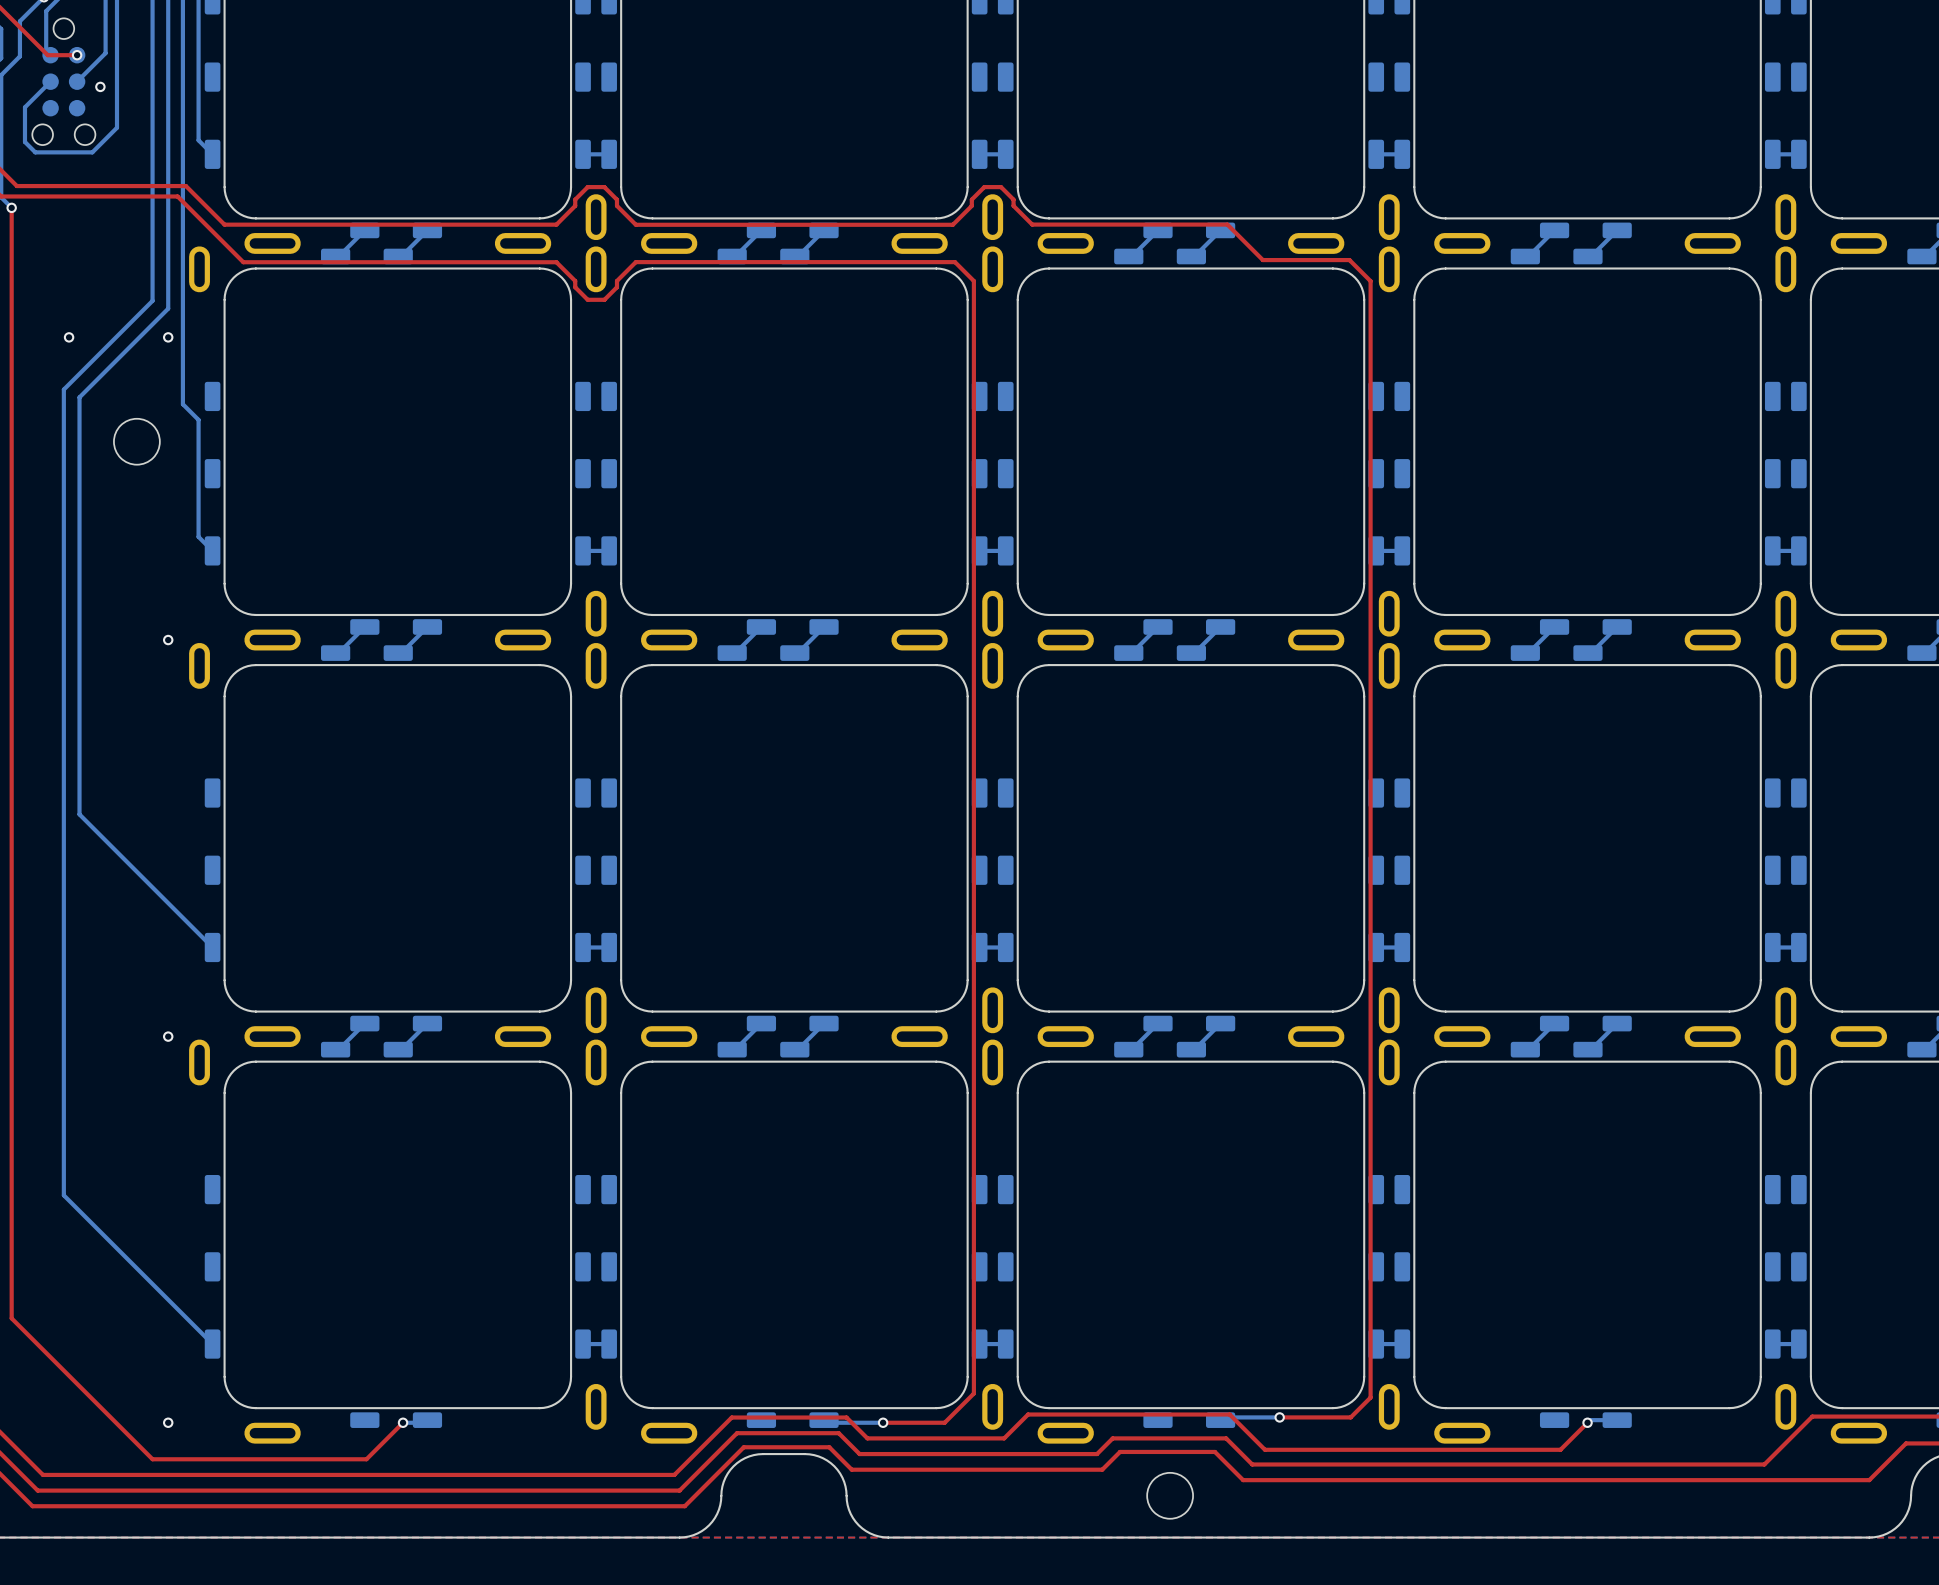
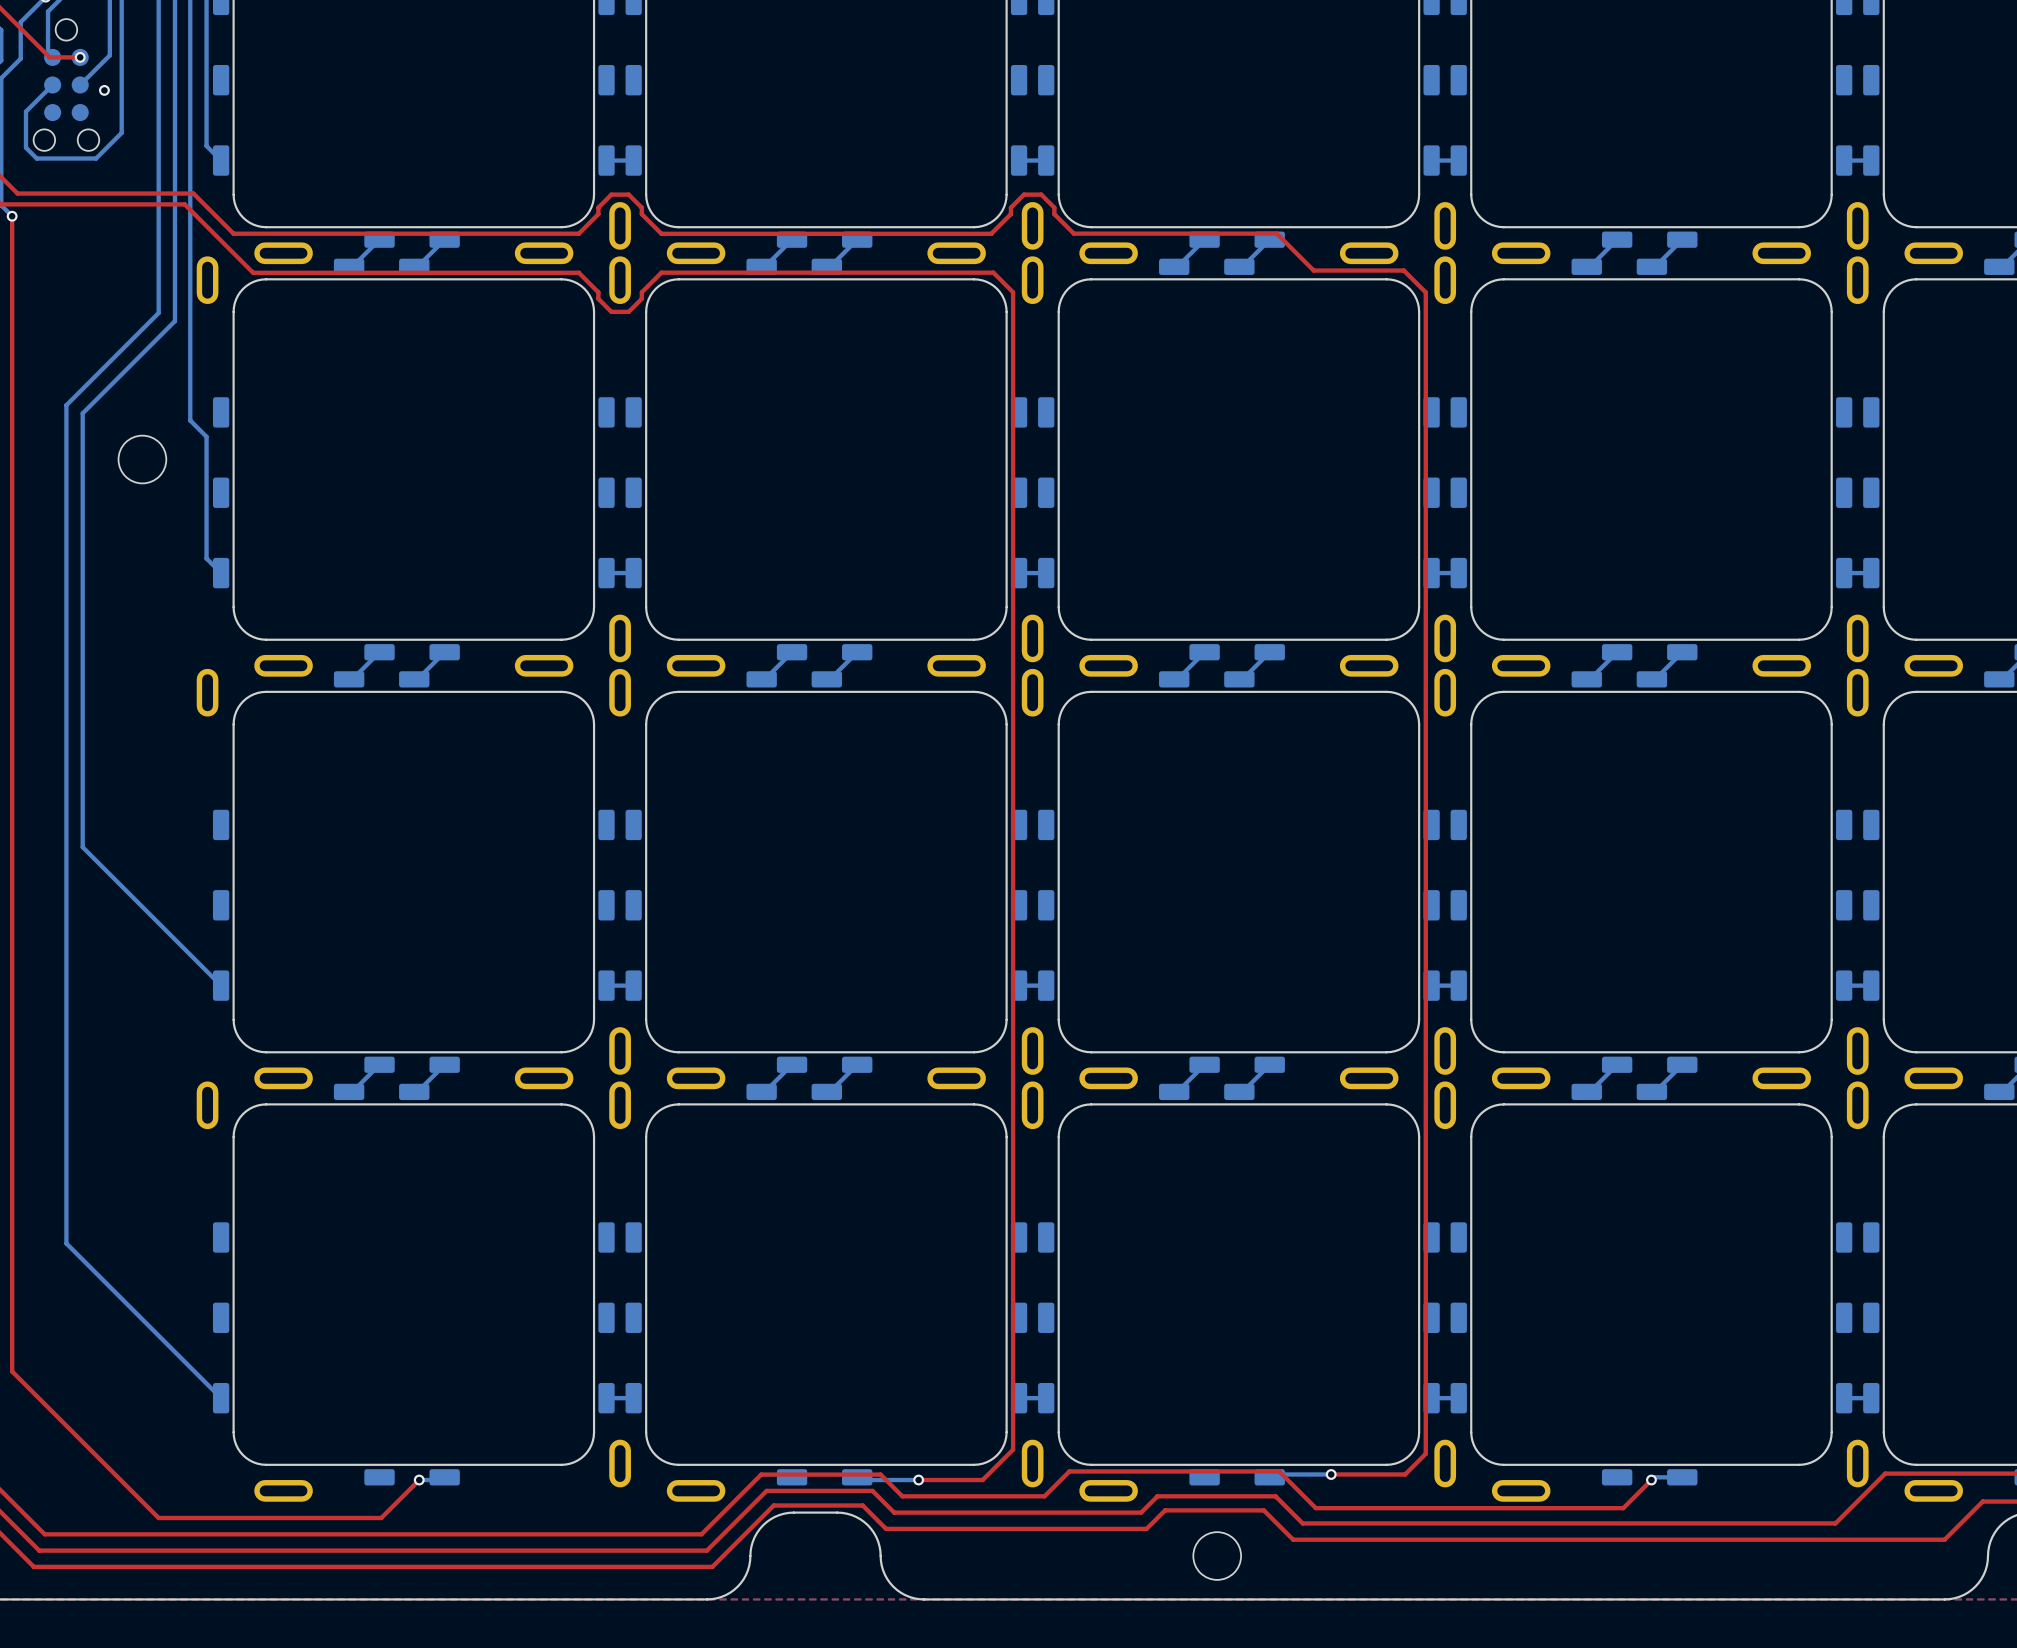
via: (69, 337) -> none
via: (168, 337) -> none
via: (168, 640) -> none
via: (168, 1036) -> none
via: (168, 1422) -> none

